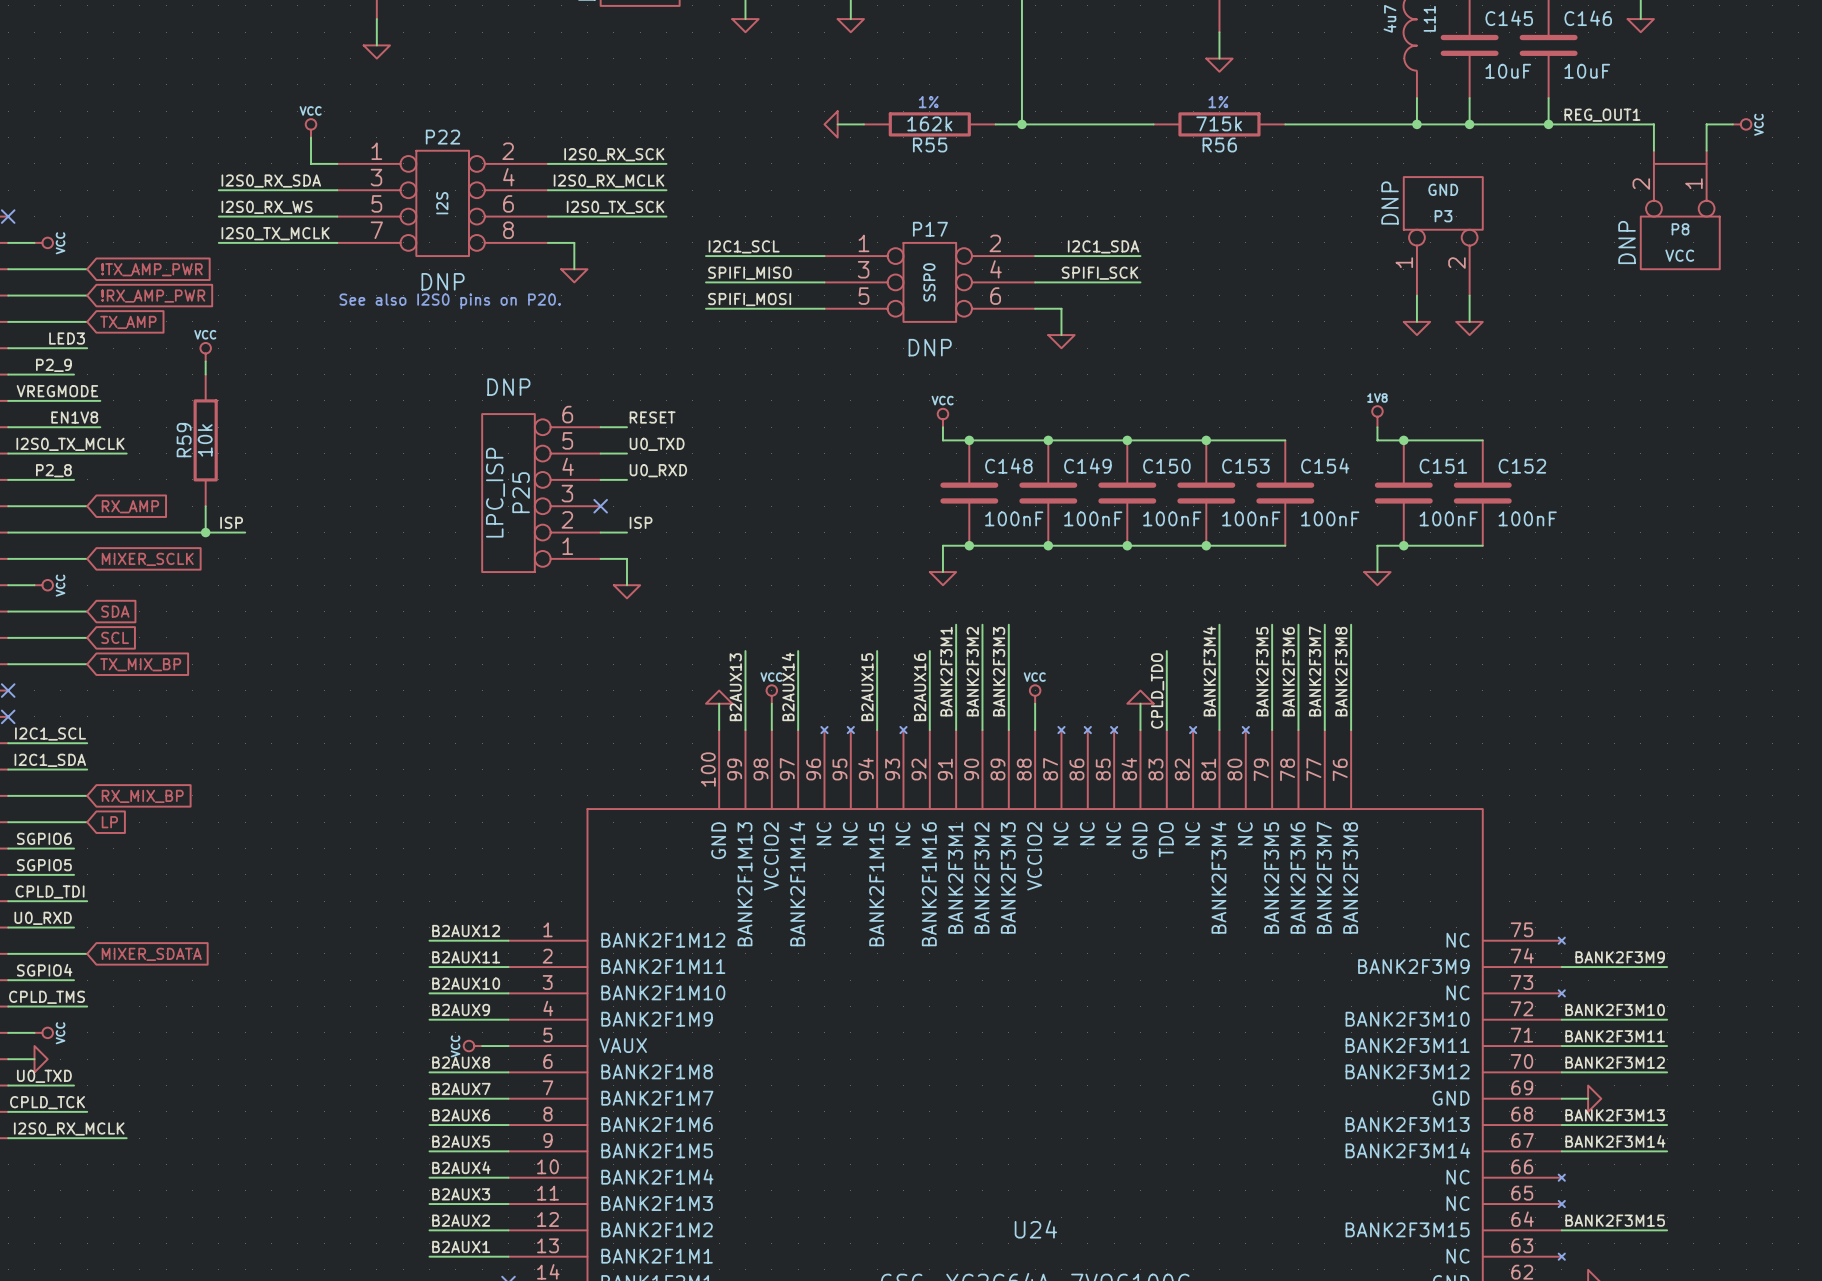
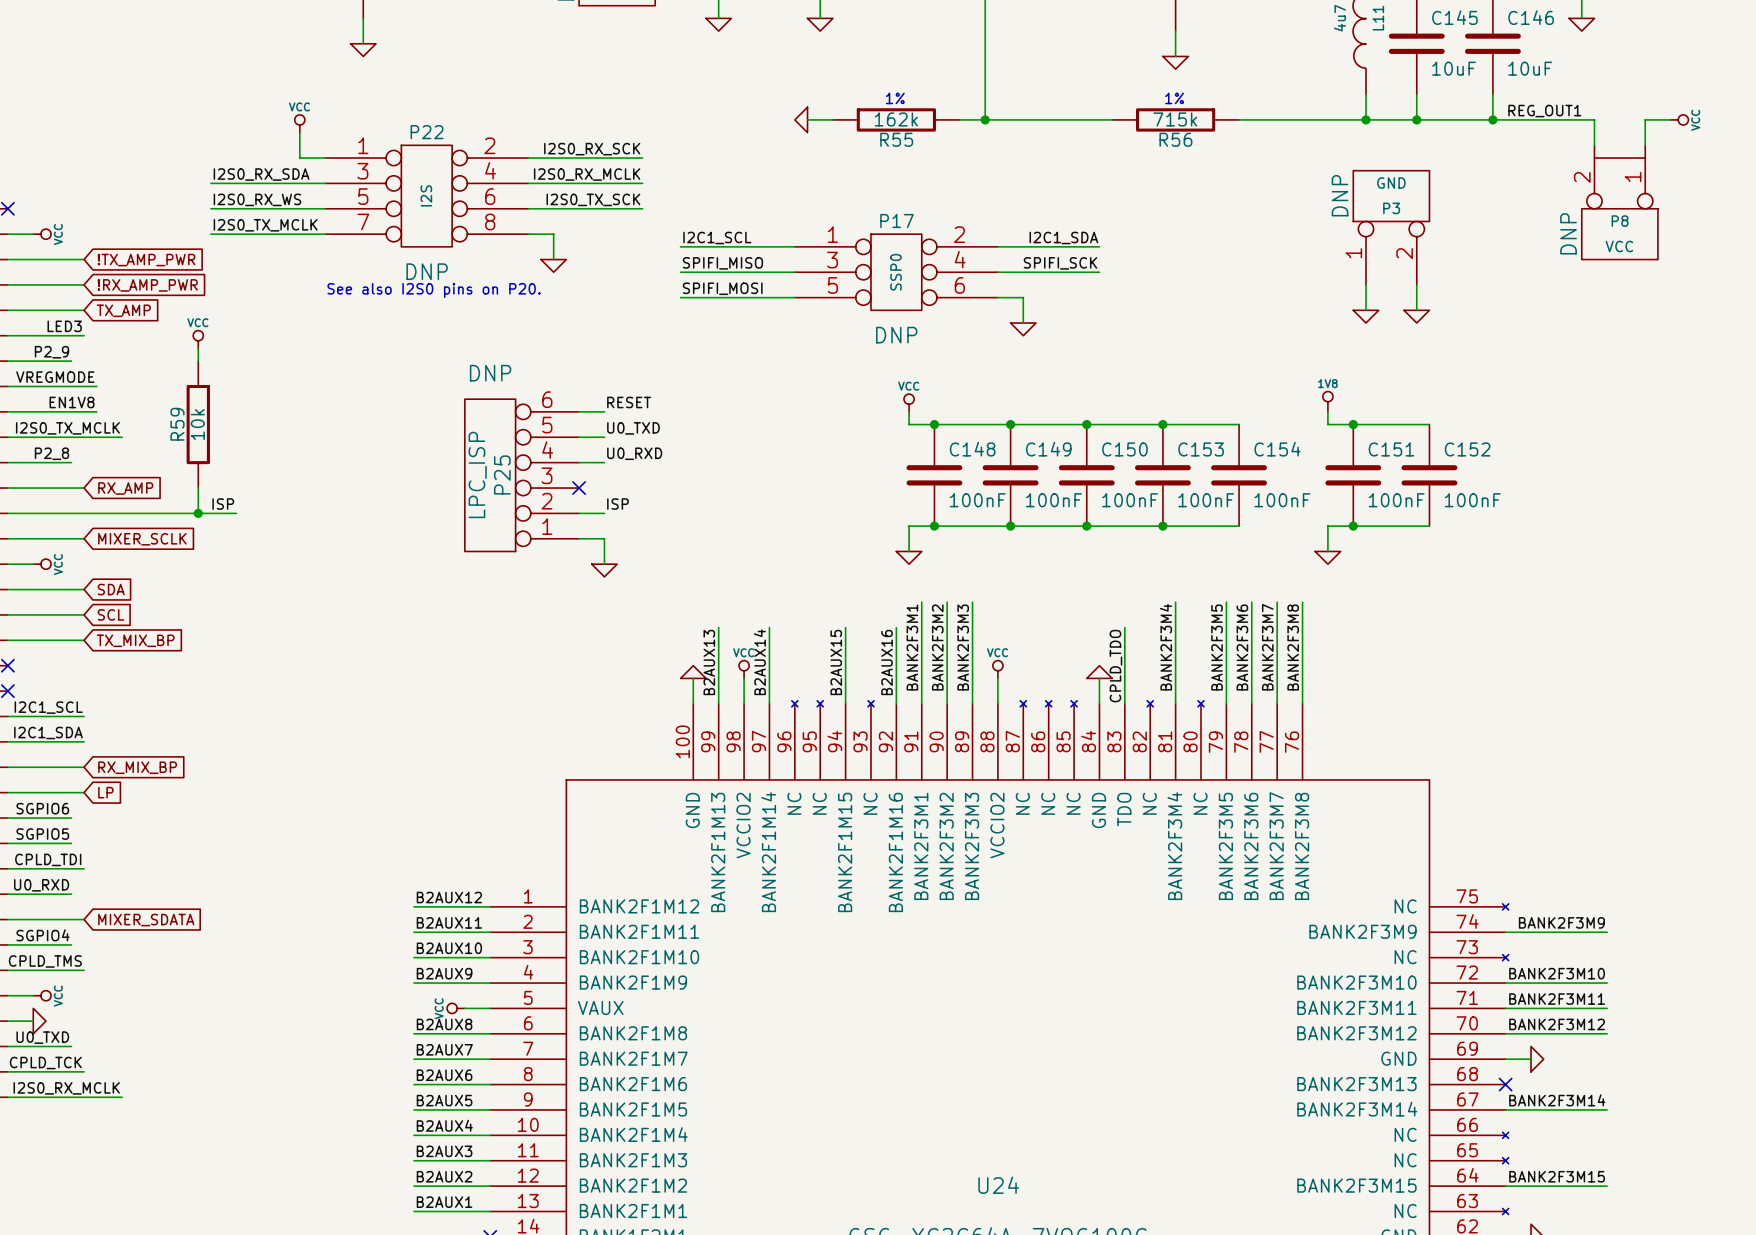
label: BANK2F3M13 (1615, 1115) -> none
wire: (1561, 1125) (1667, 1125) -> none
no-connect mark: none -> (1505, 1084)

